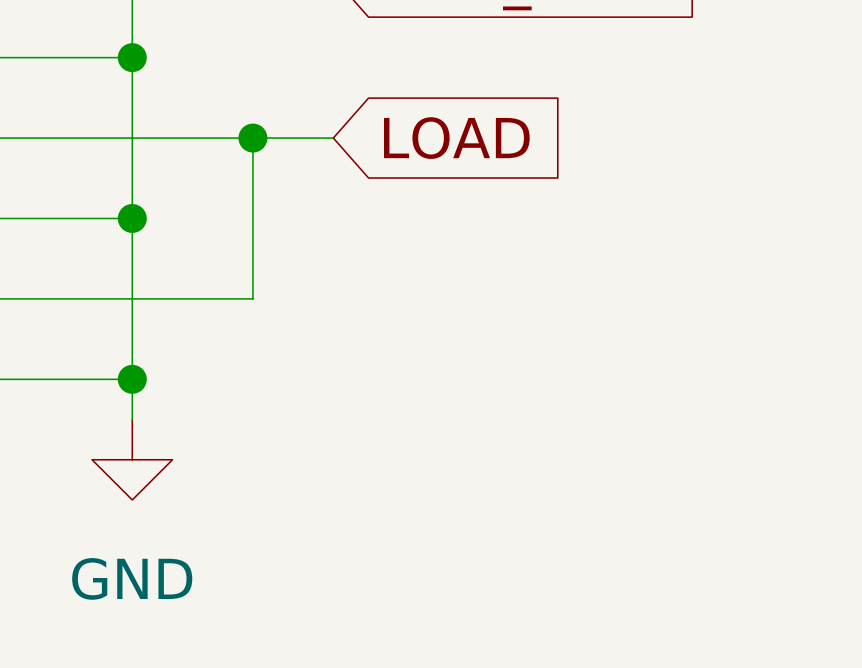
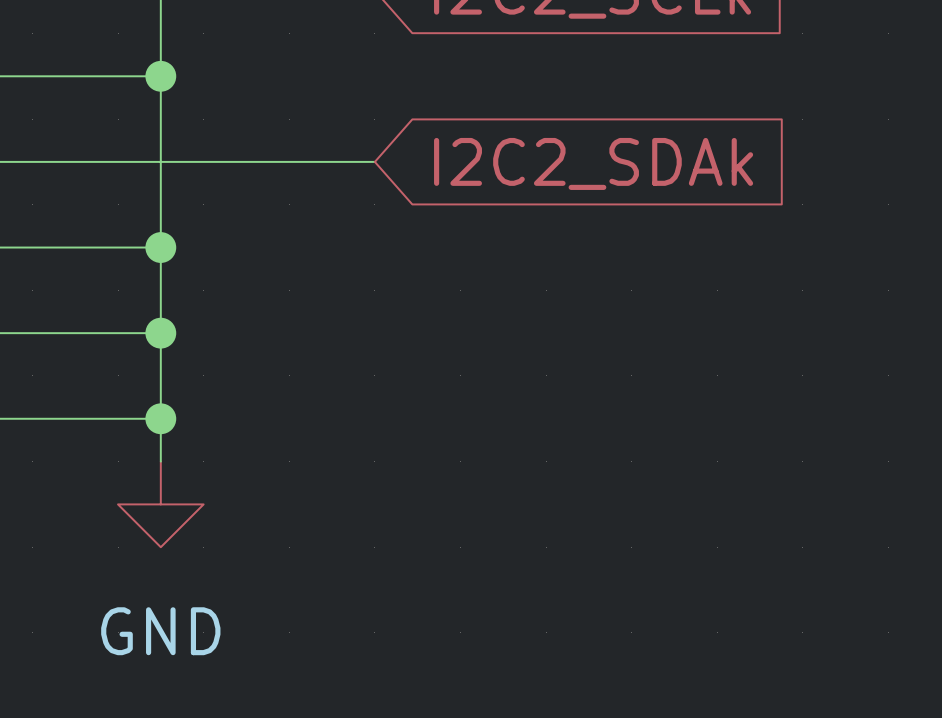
wire: (252, 138) (252, 298) (132, 298) -> none
junction: (252, 138) -> none
global label: LOAD (456, 138) -> I2C2_SDAk (593, 163)
junction: none -> (160, 333)

